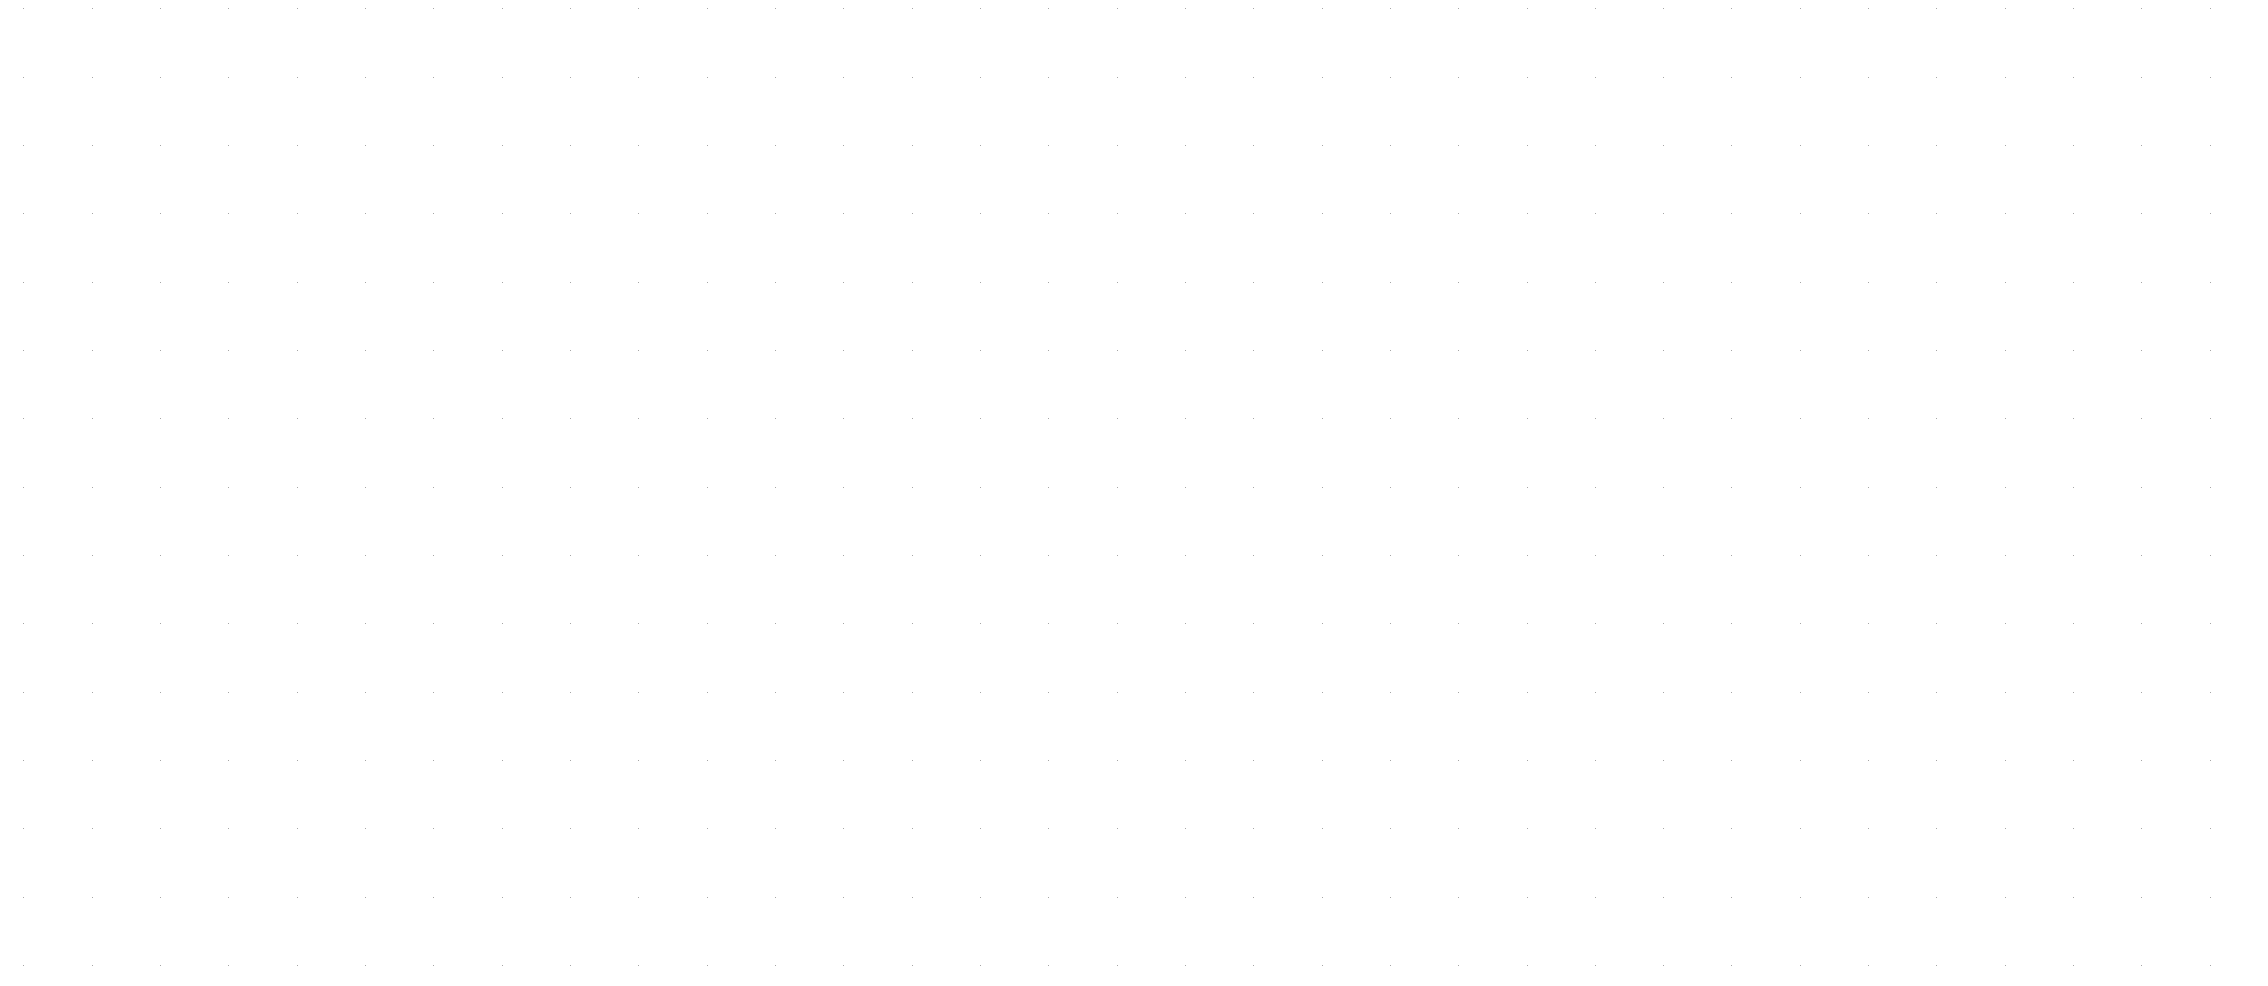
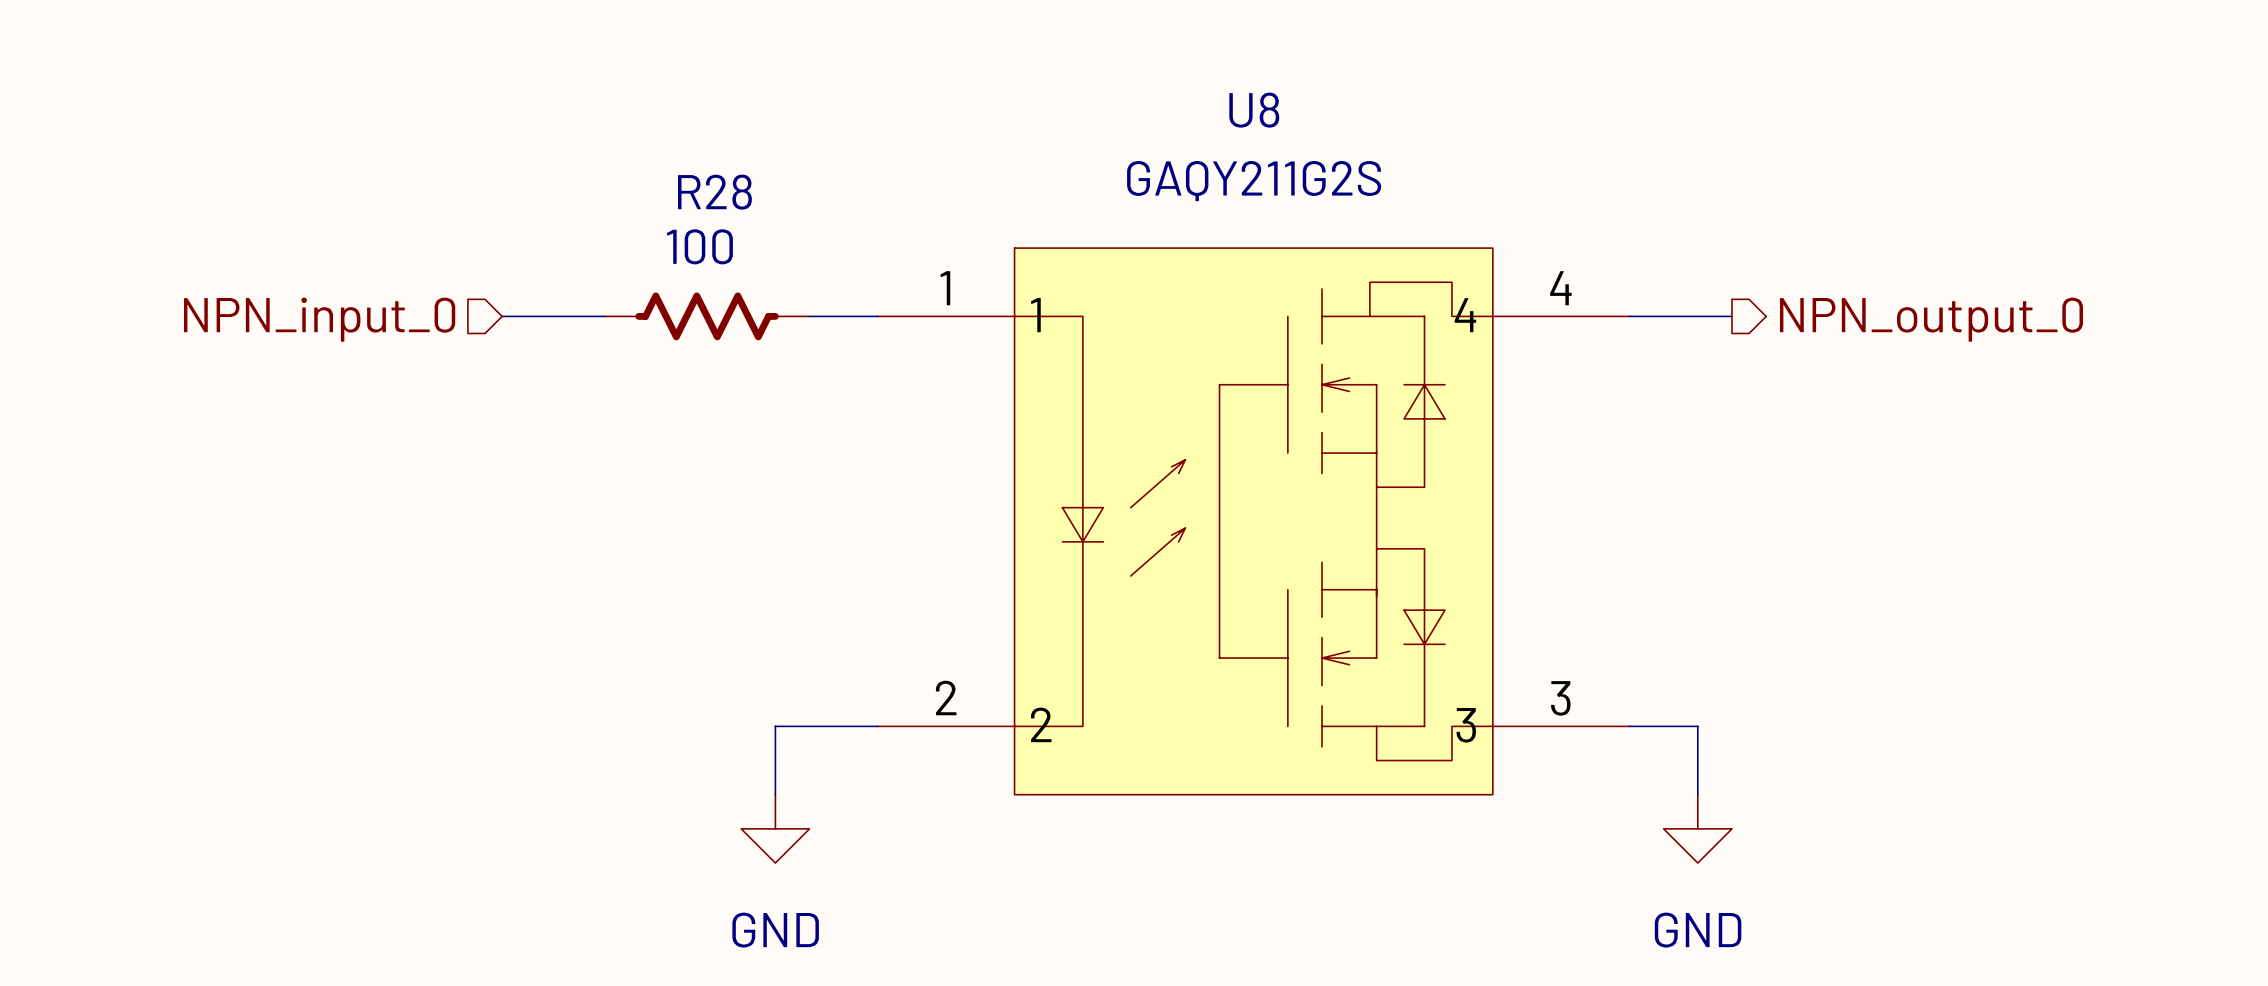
wire: none -> (502, 316) (604, 316)
R28: none -> (707, 316)
wire: none -> (809, 316) (877, 316)
wire: none -> (1629, 316) (1731, 316)
hierarchical label: none -> NPN_input_0 (319, 319)
hierarchical label: none -> NPN_output_0 (1931, 319)
U8: none -> GAQY211G2S (1253, 521)
wire: none -> (877, 726) (775, 726) (775, 794)
wire: none -> (1629, 726) (1697, 726) (1697, 794)
power symbol: none -> GND (775, 828)
power symbol: none -> GND (1697, 828)

